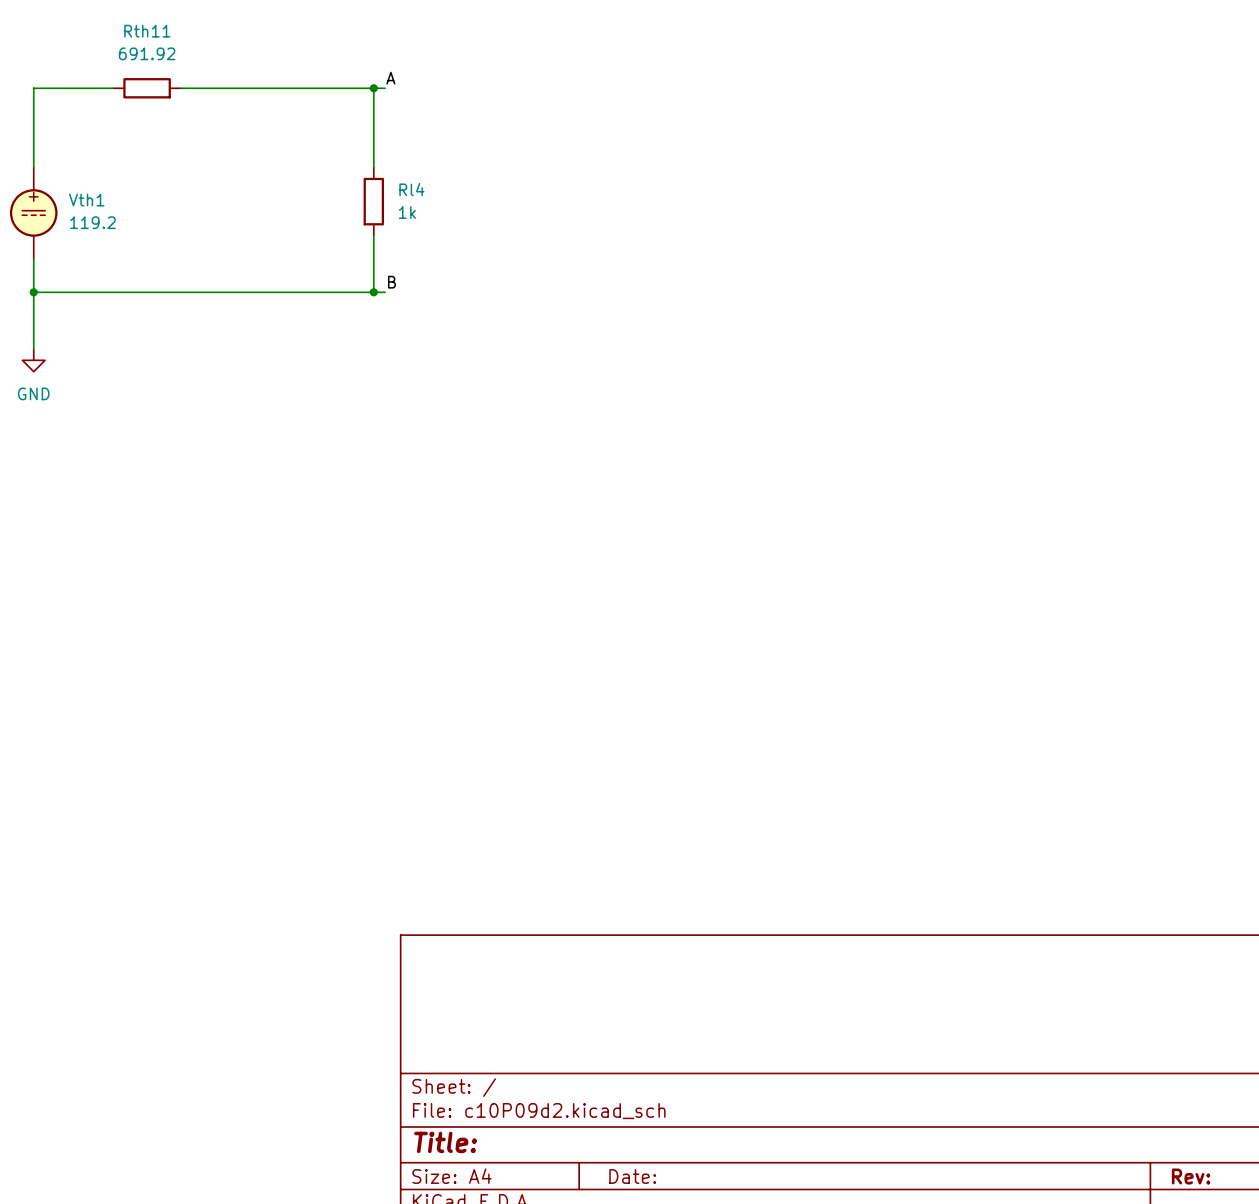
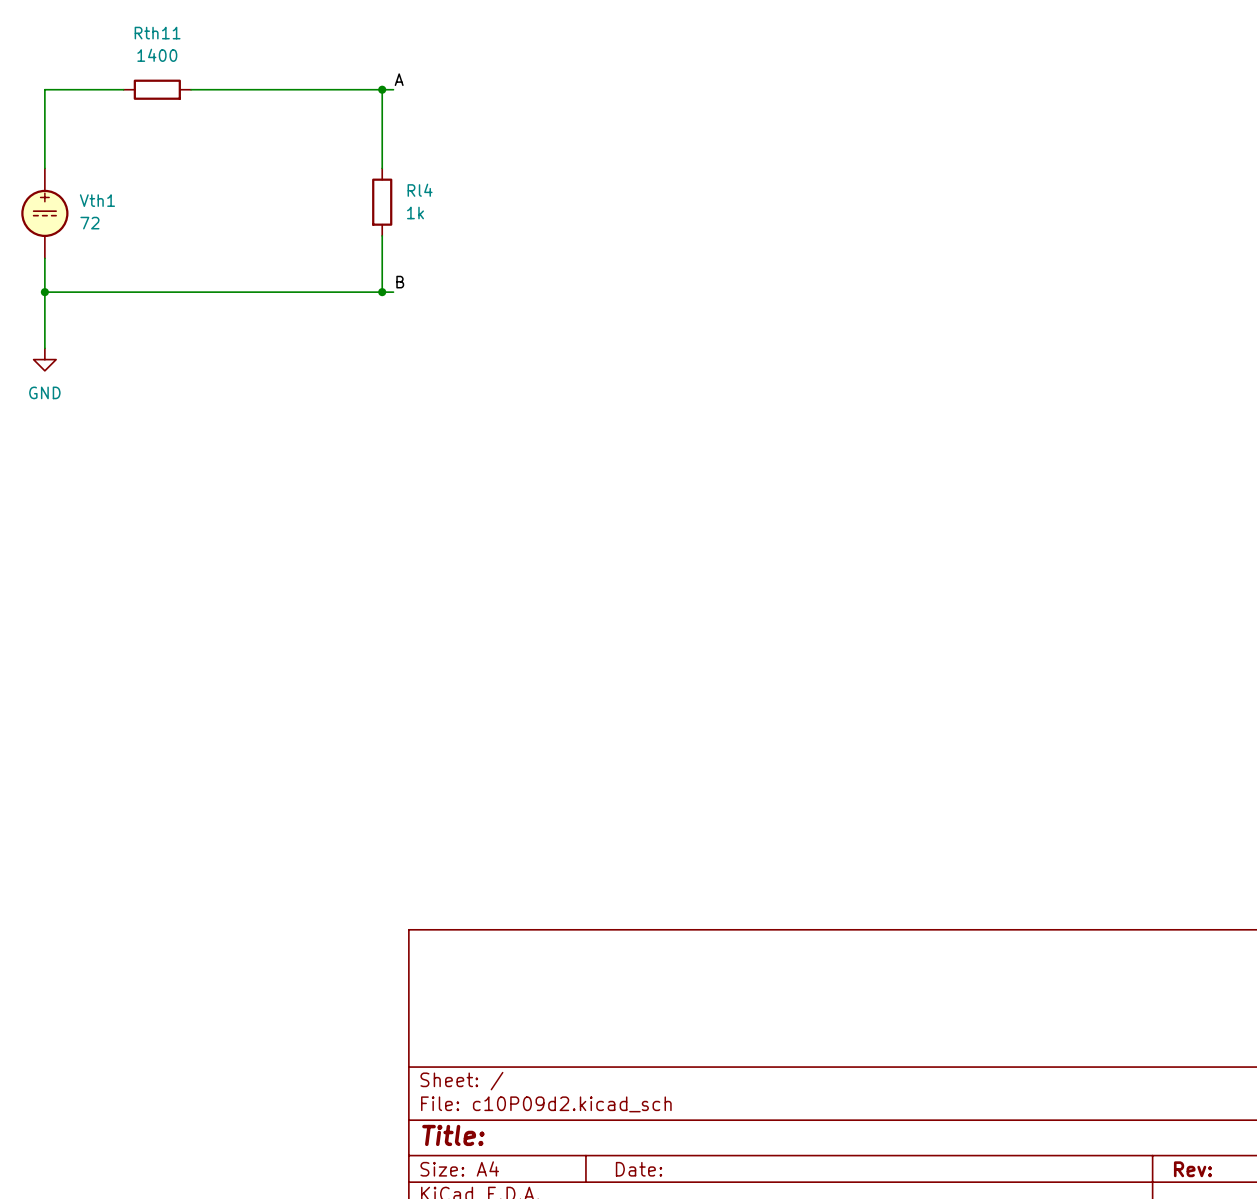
Rth11 value: 691.92 (147, 53) -> 1400 (157, 55)
Vth1 value: 119.2 (92, 222) -> 72 (89, 223)

